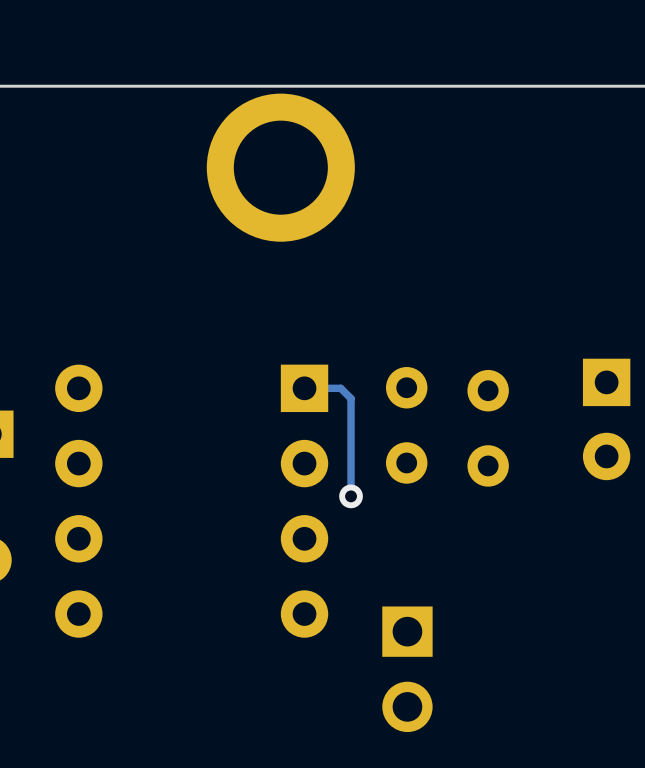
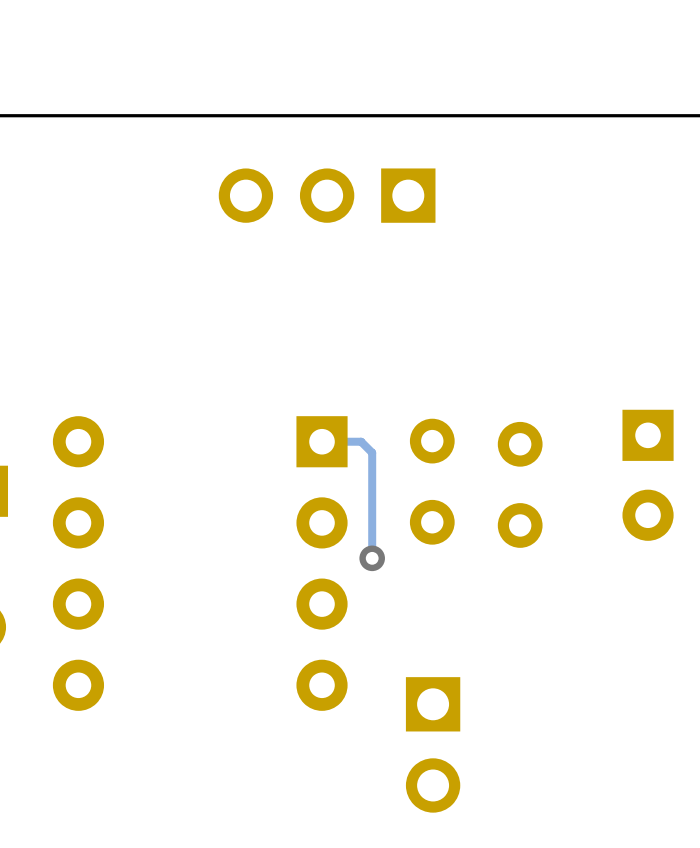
part footprint: [206, 93, 355, 242] -> [218, 168, 436, 223]

